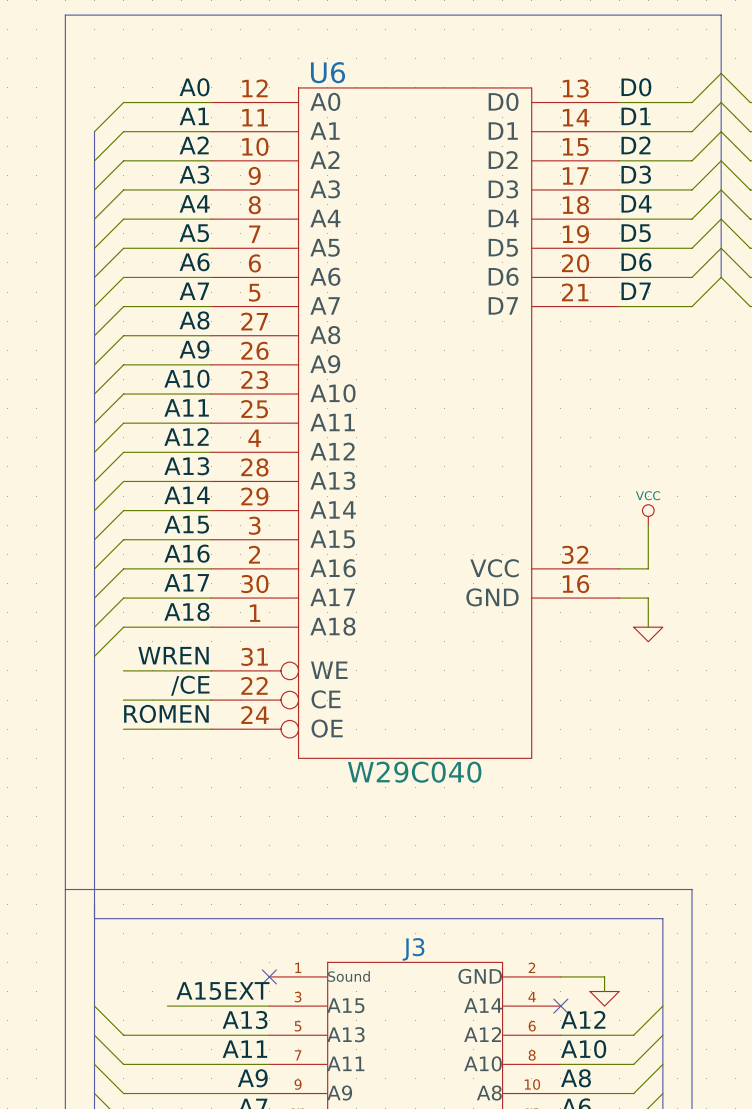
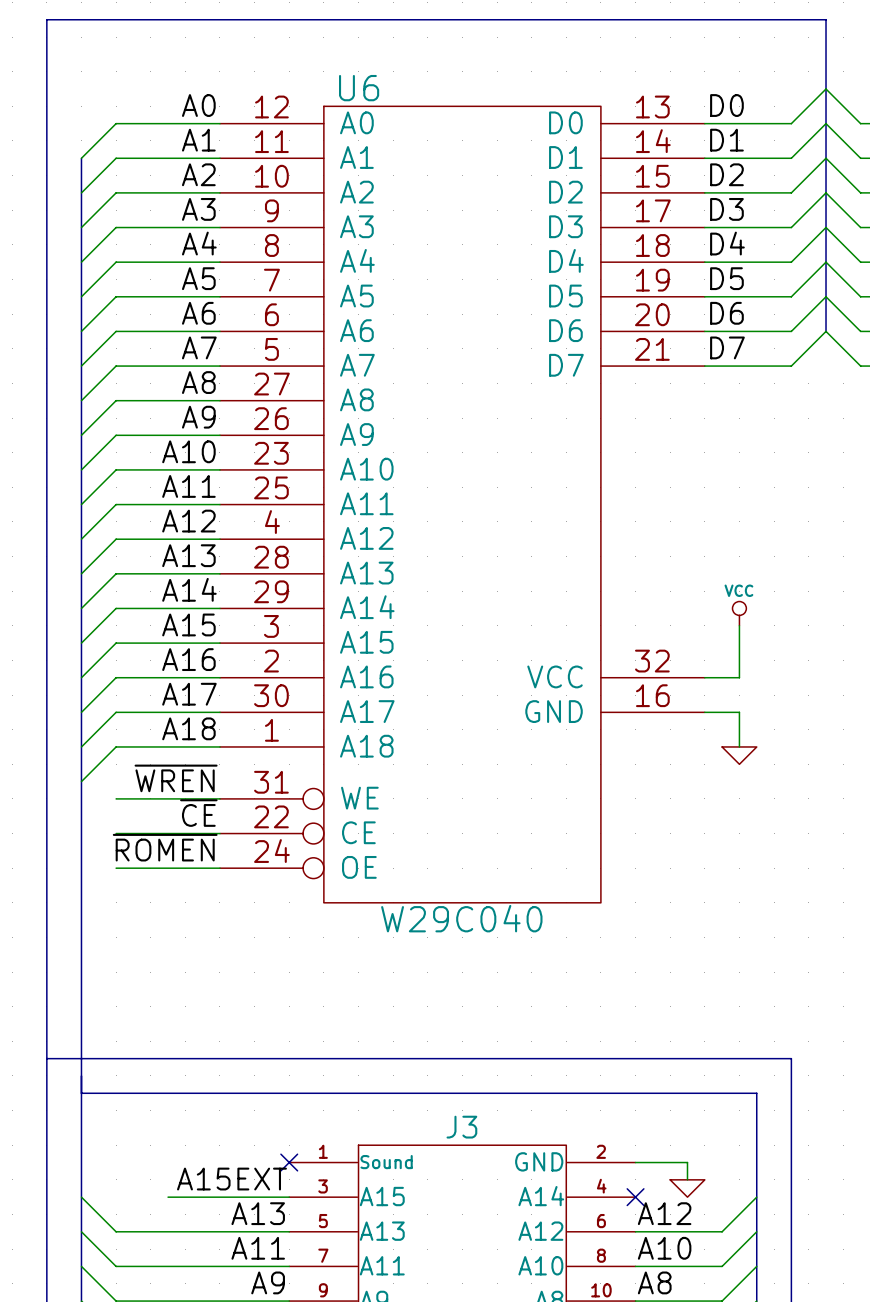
label: WREN (173, 655) -> ~{WREN} (176, 778)
label: /CE (190, 685) -> ~{CE} (198, 813)
label: ROMEN (166, 713) -> ~{ROMEN} (165, 847)

